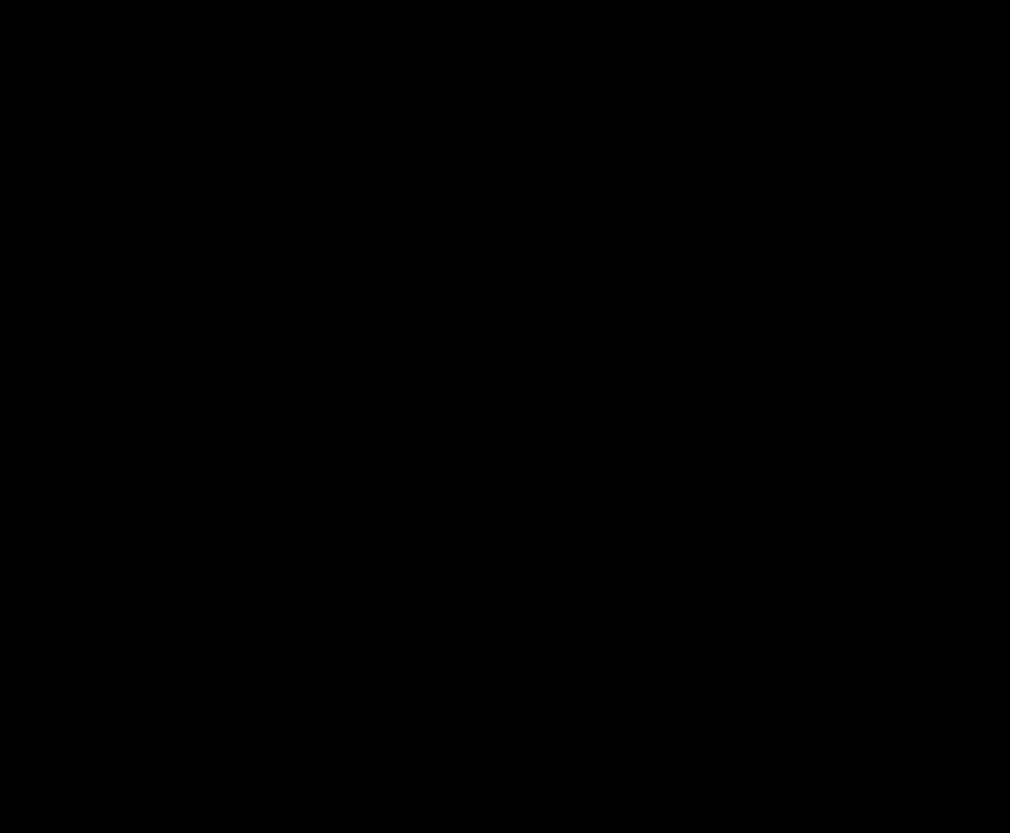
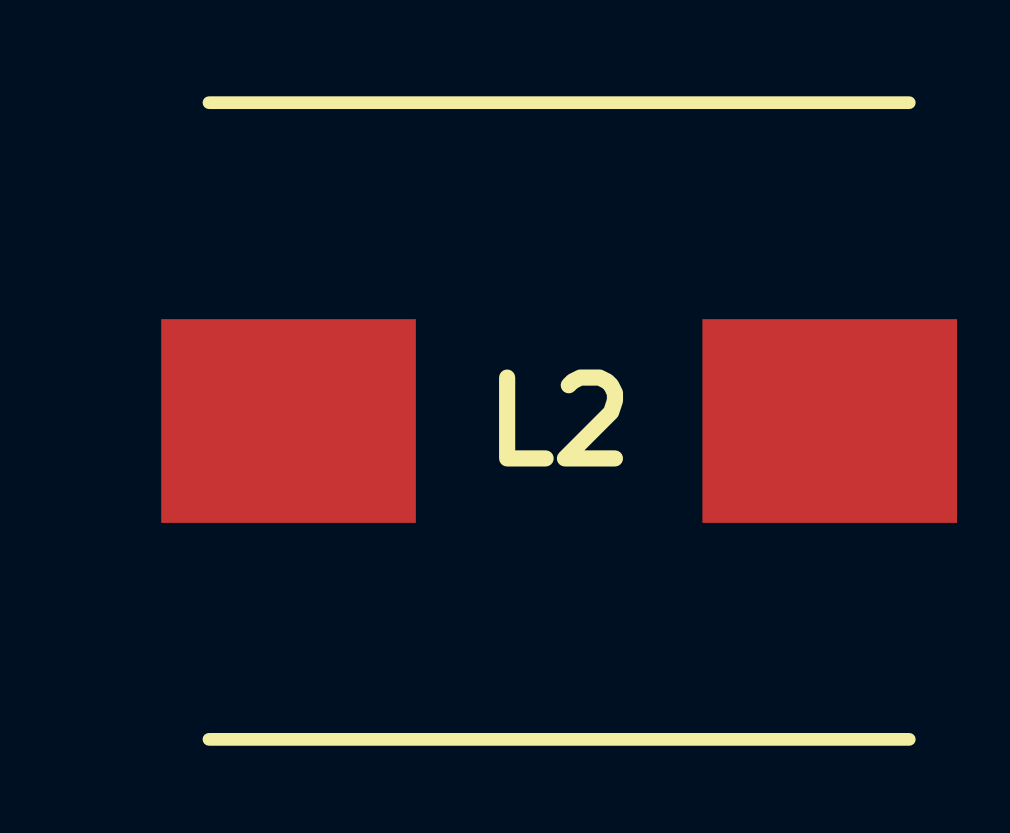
L2: none -> (559, 421)

